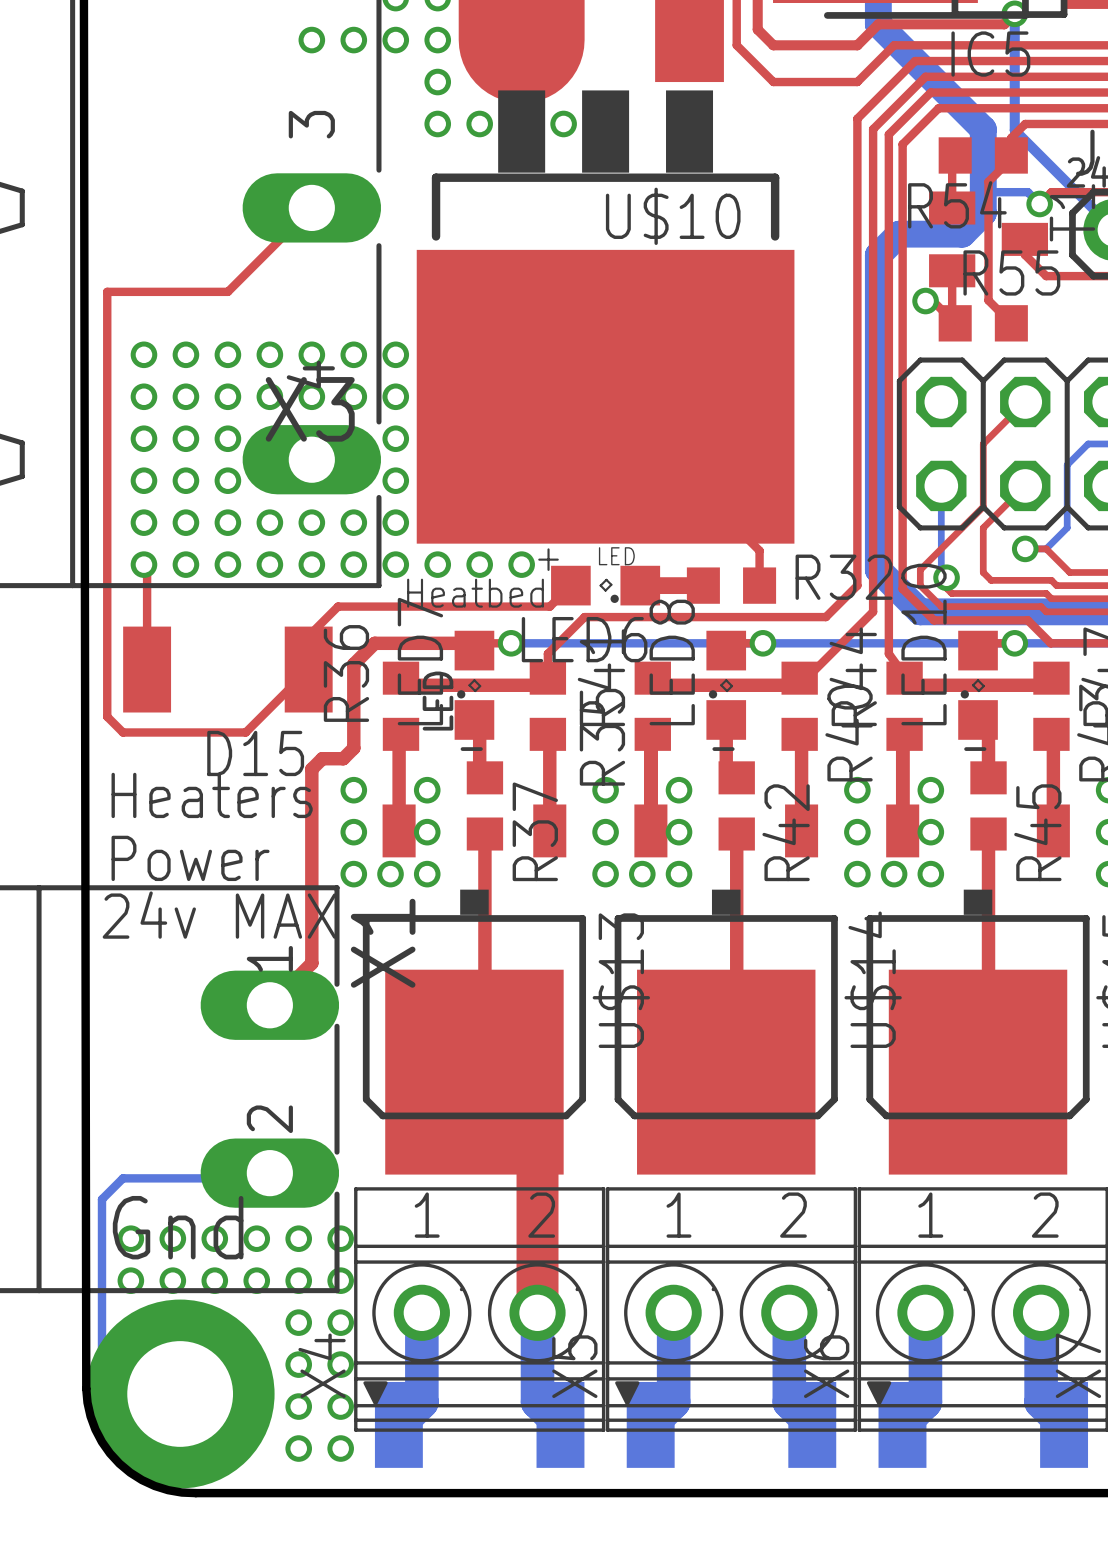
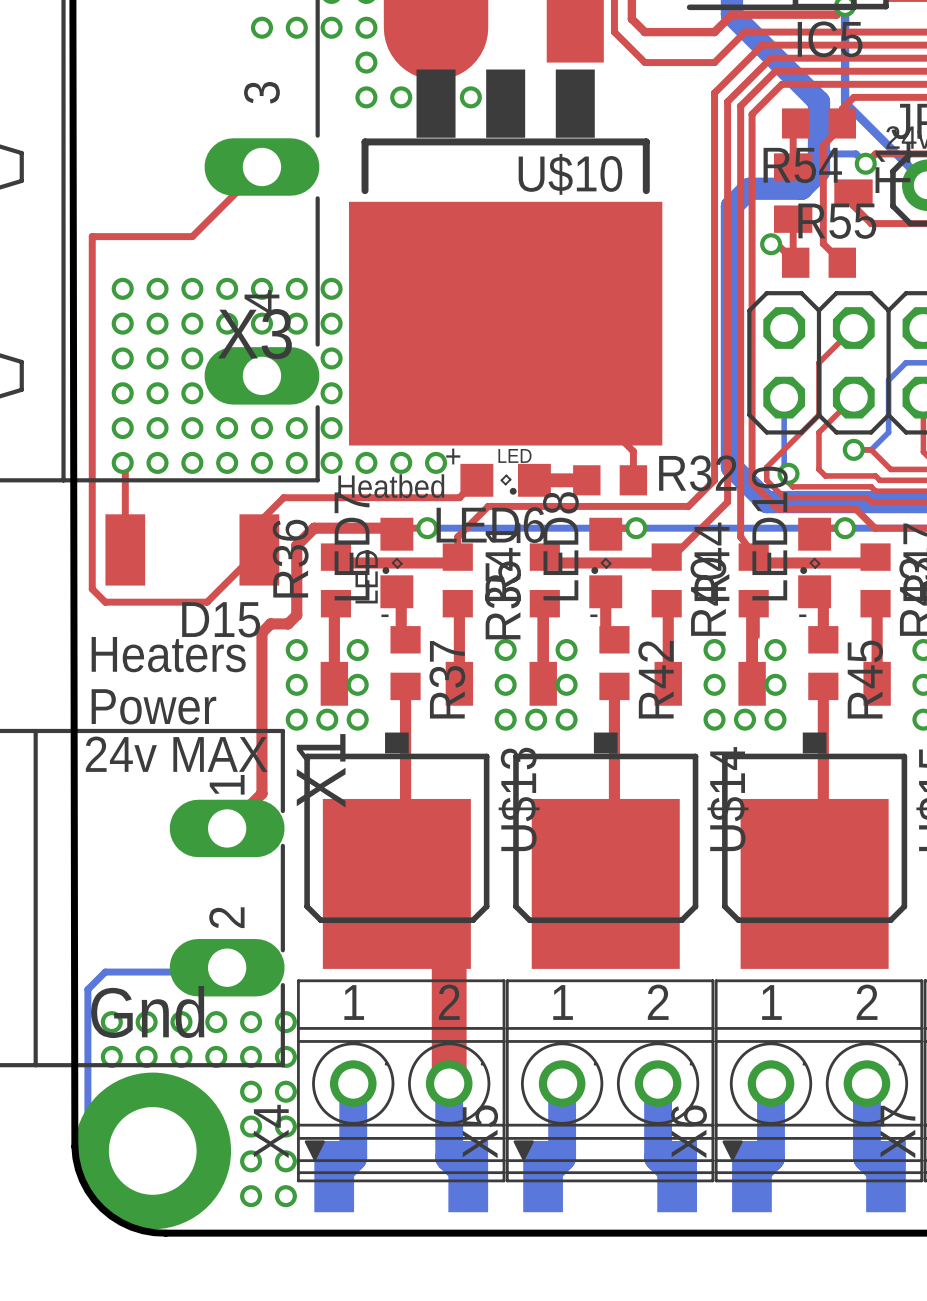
top track: none -> (753, 603) (758, 610) (758, 636)

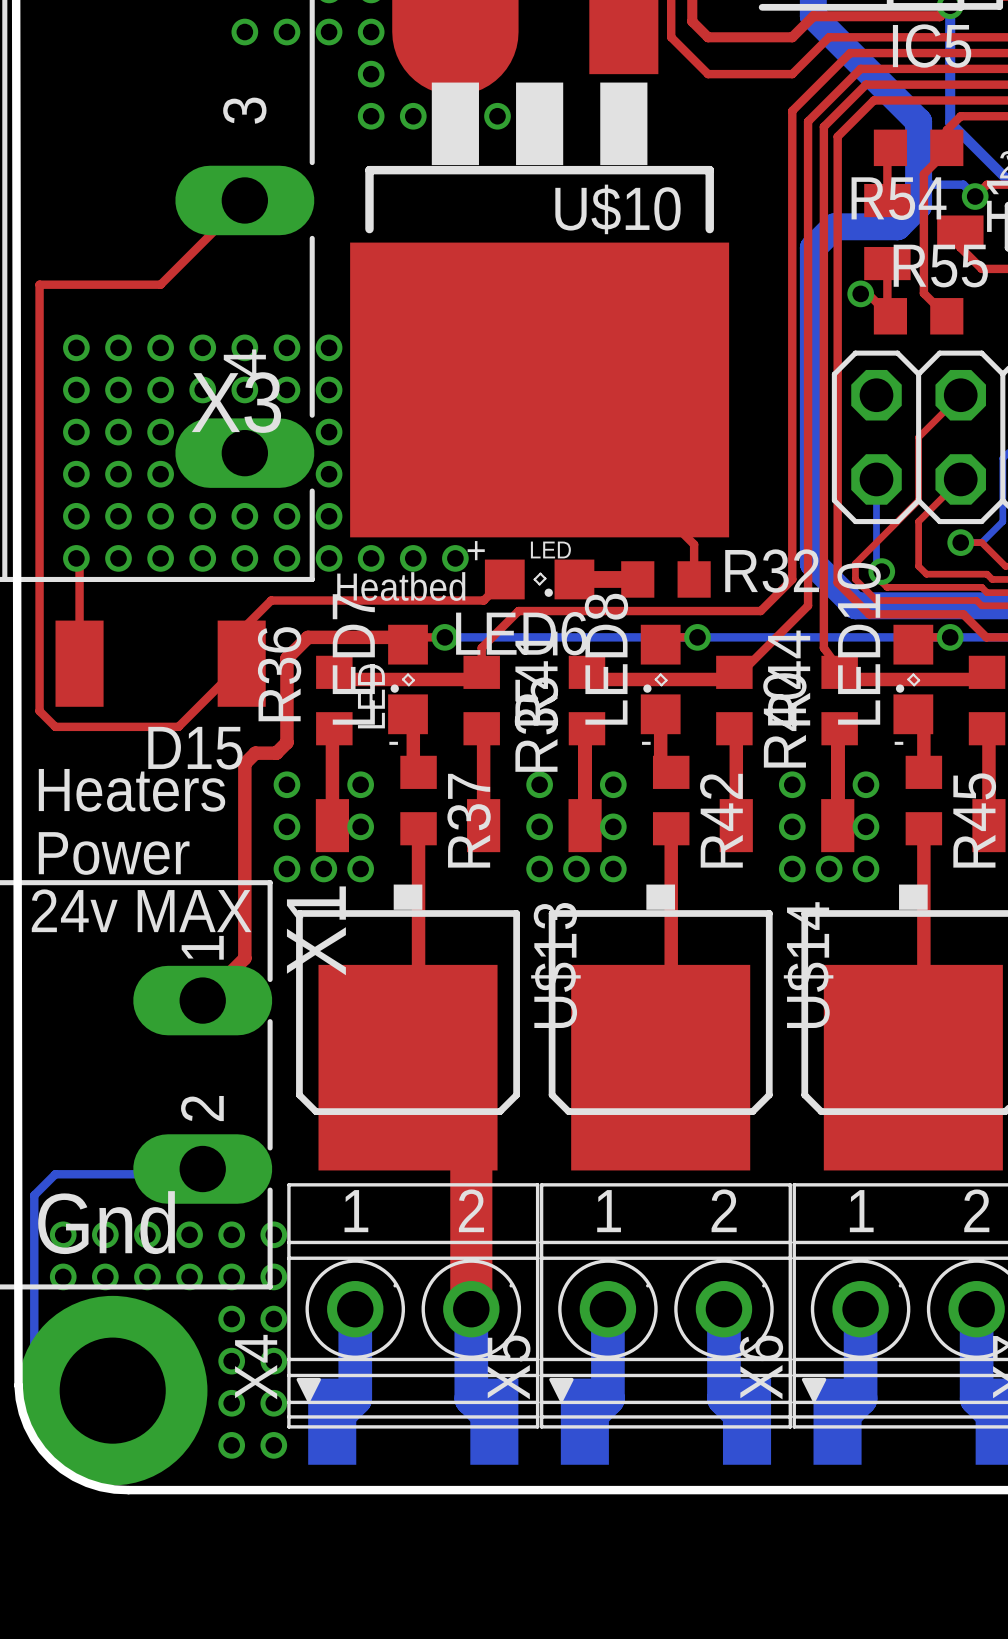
top track: (753, 603) (758, 610) (758, 636) -> none

